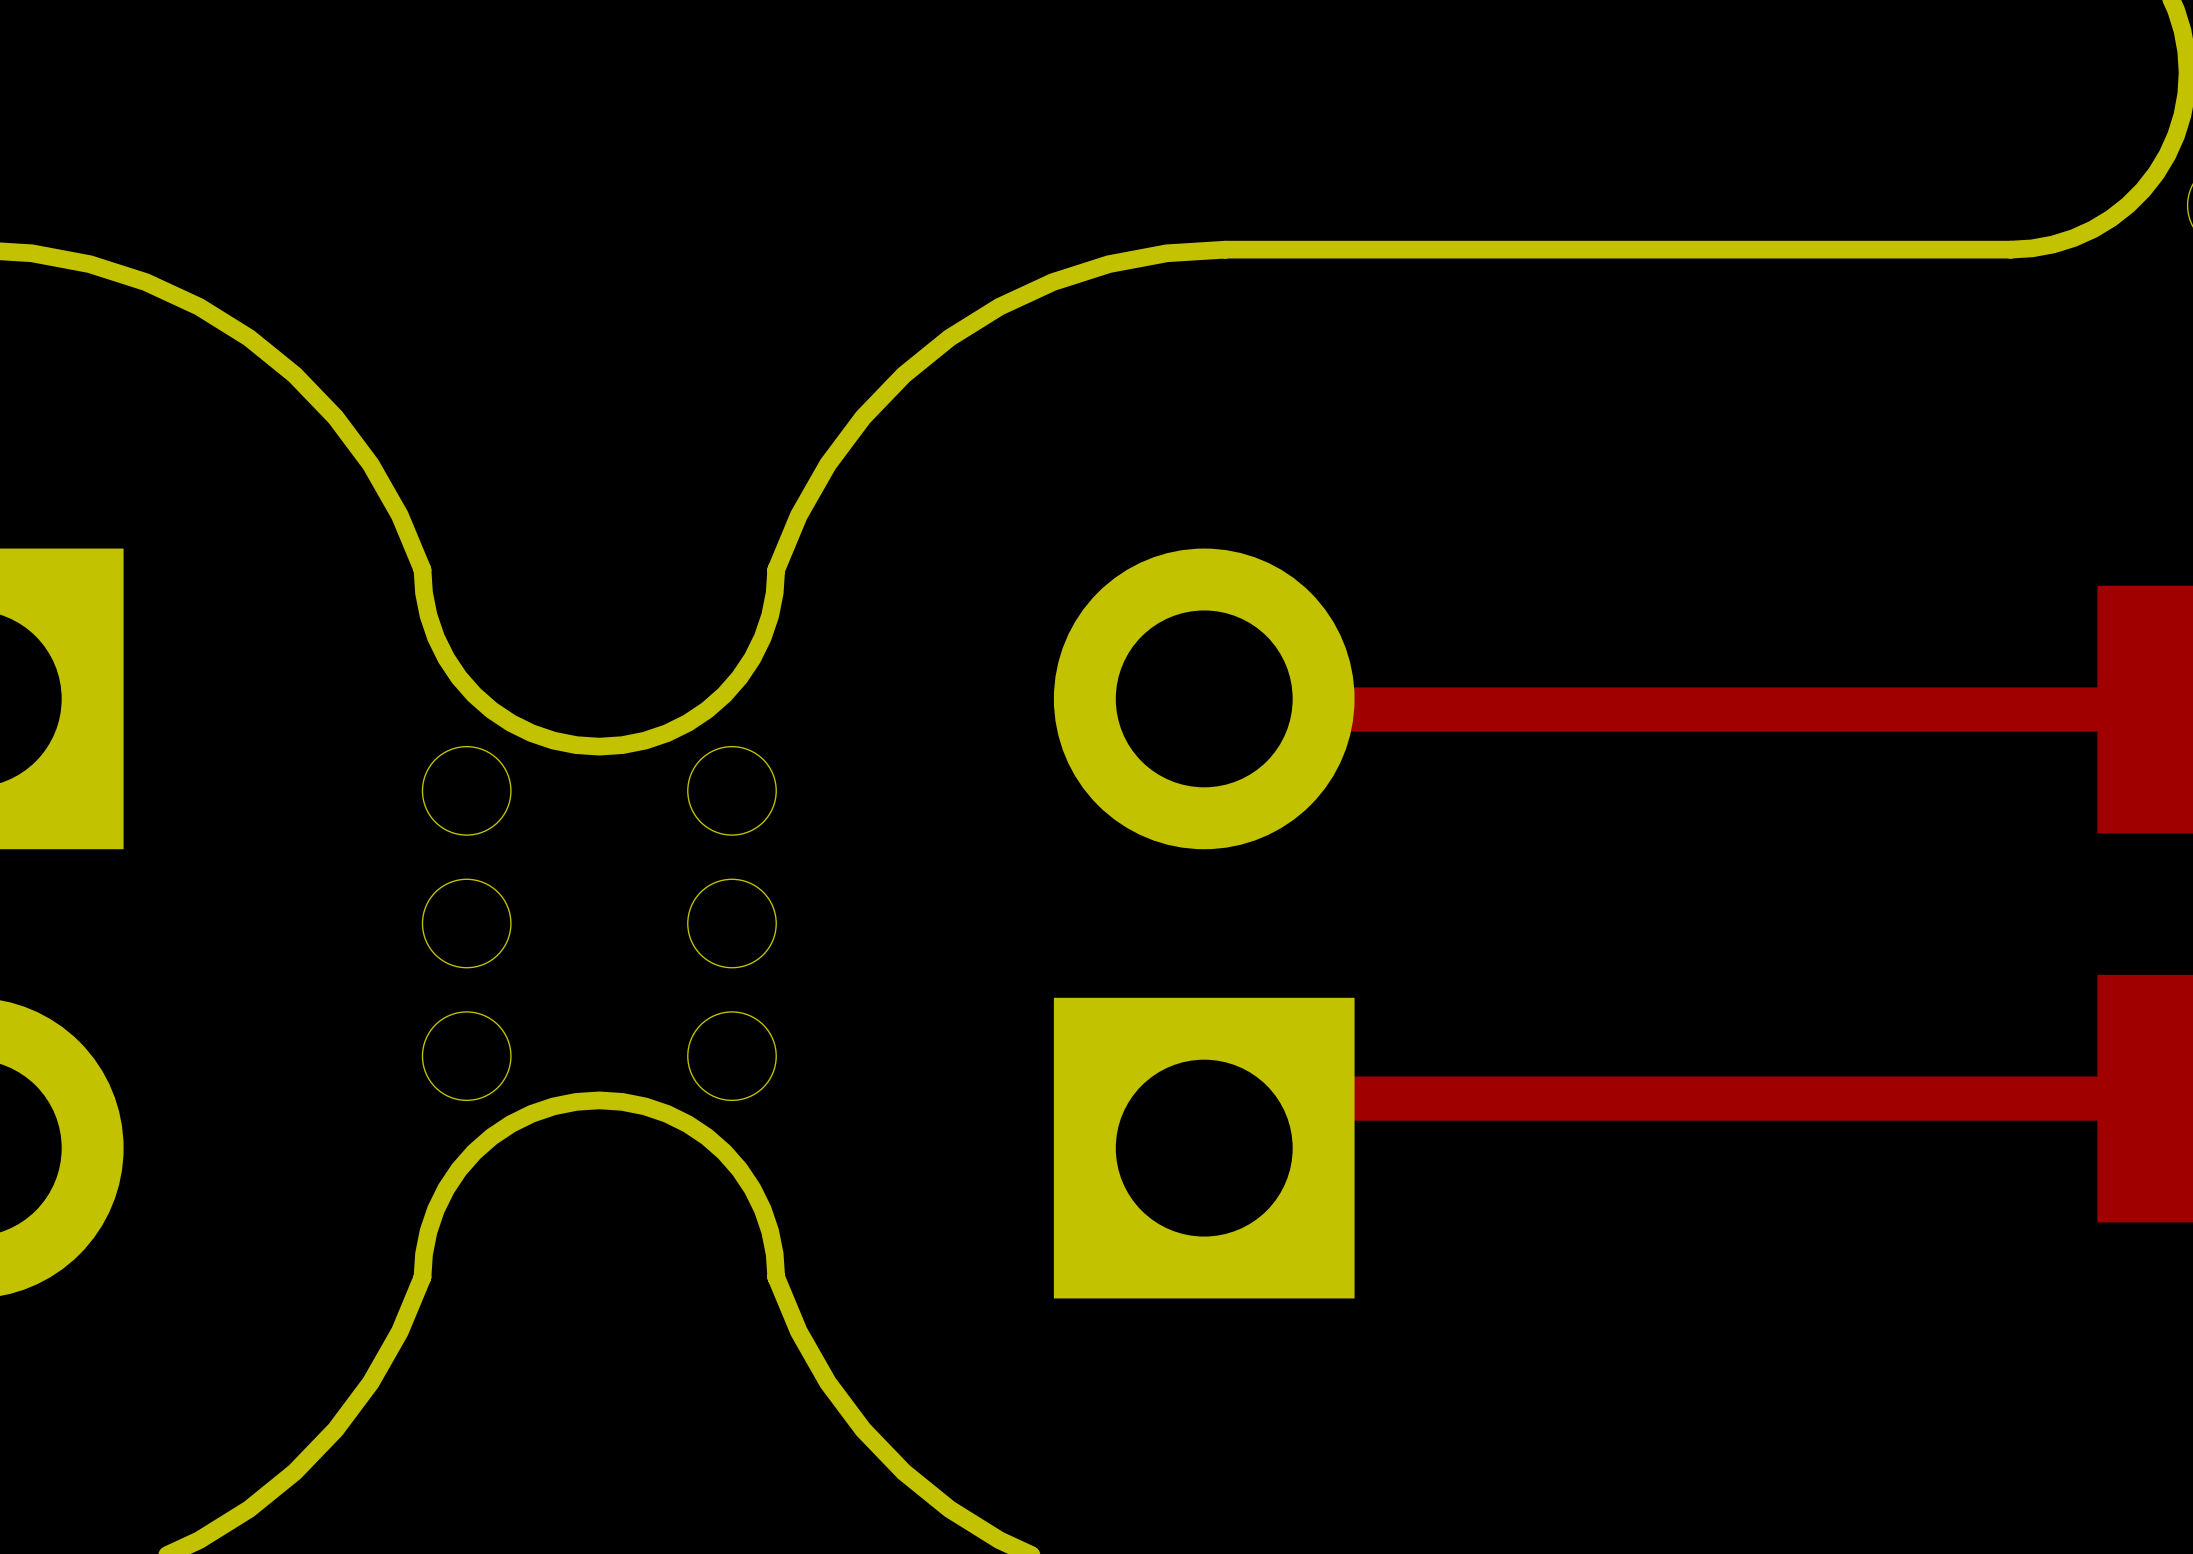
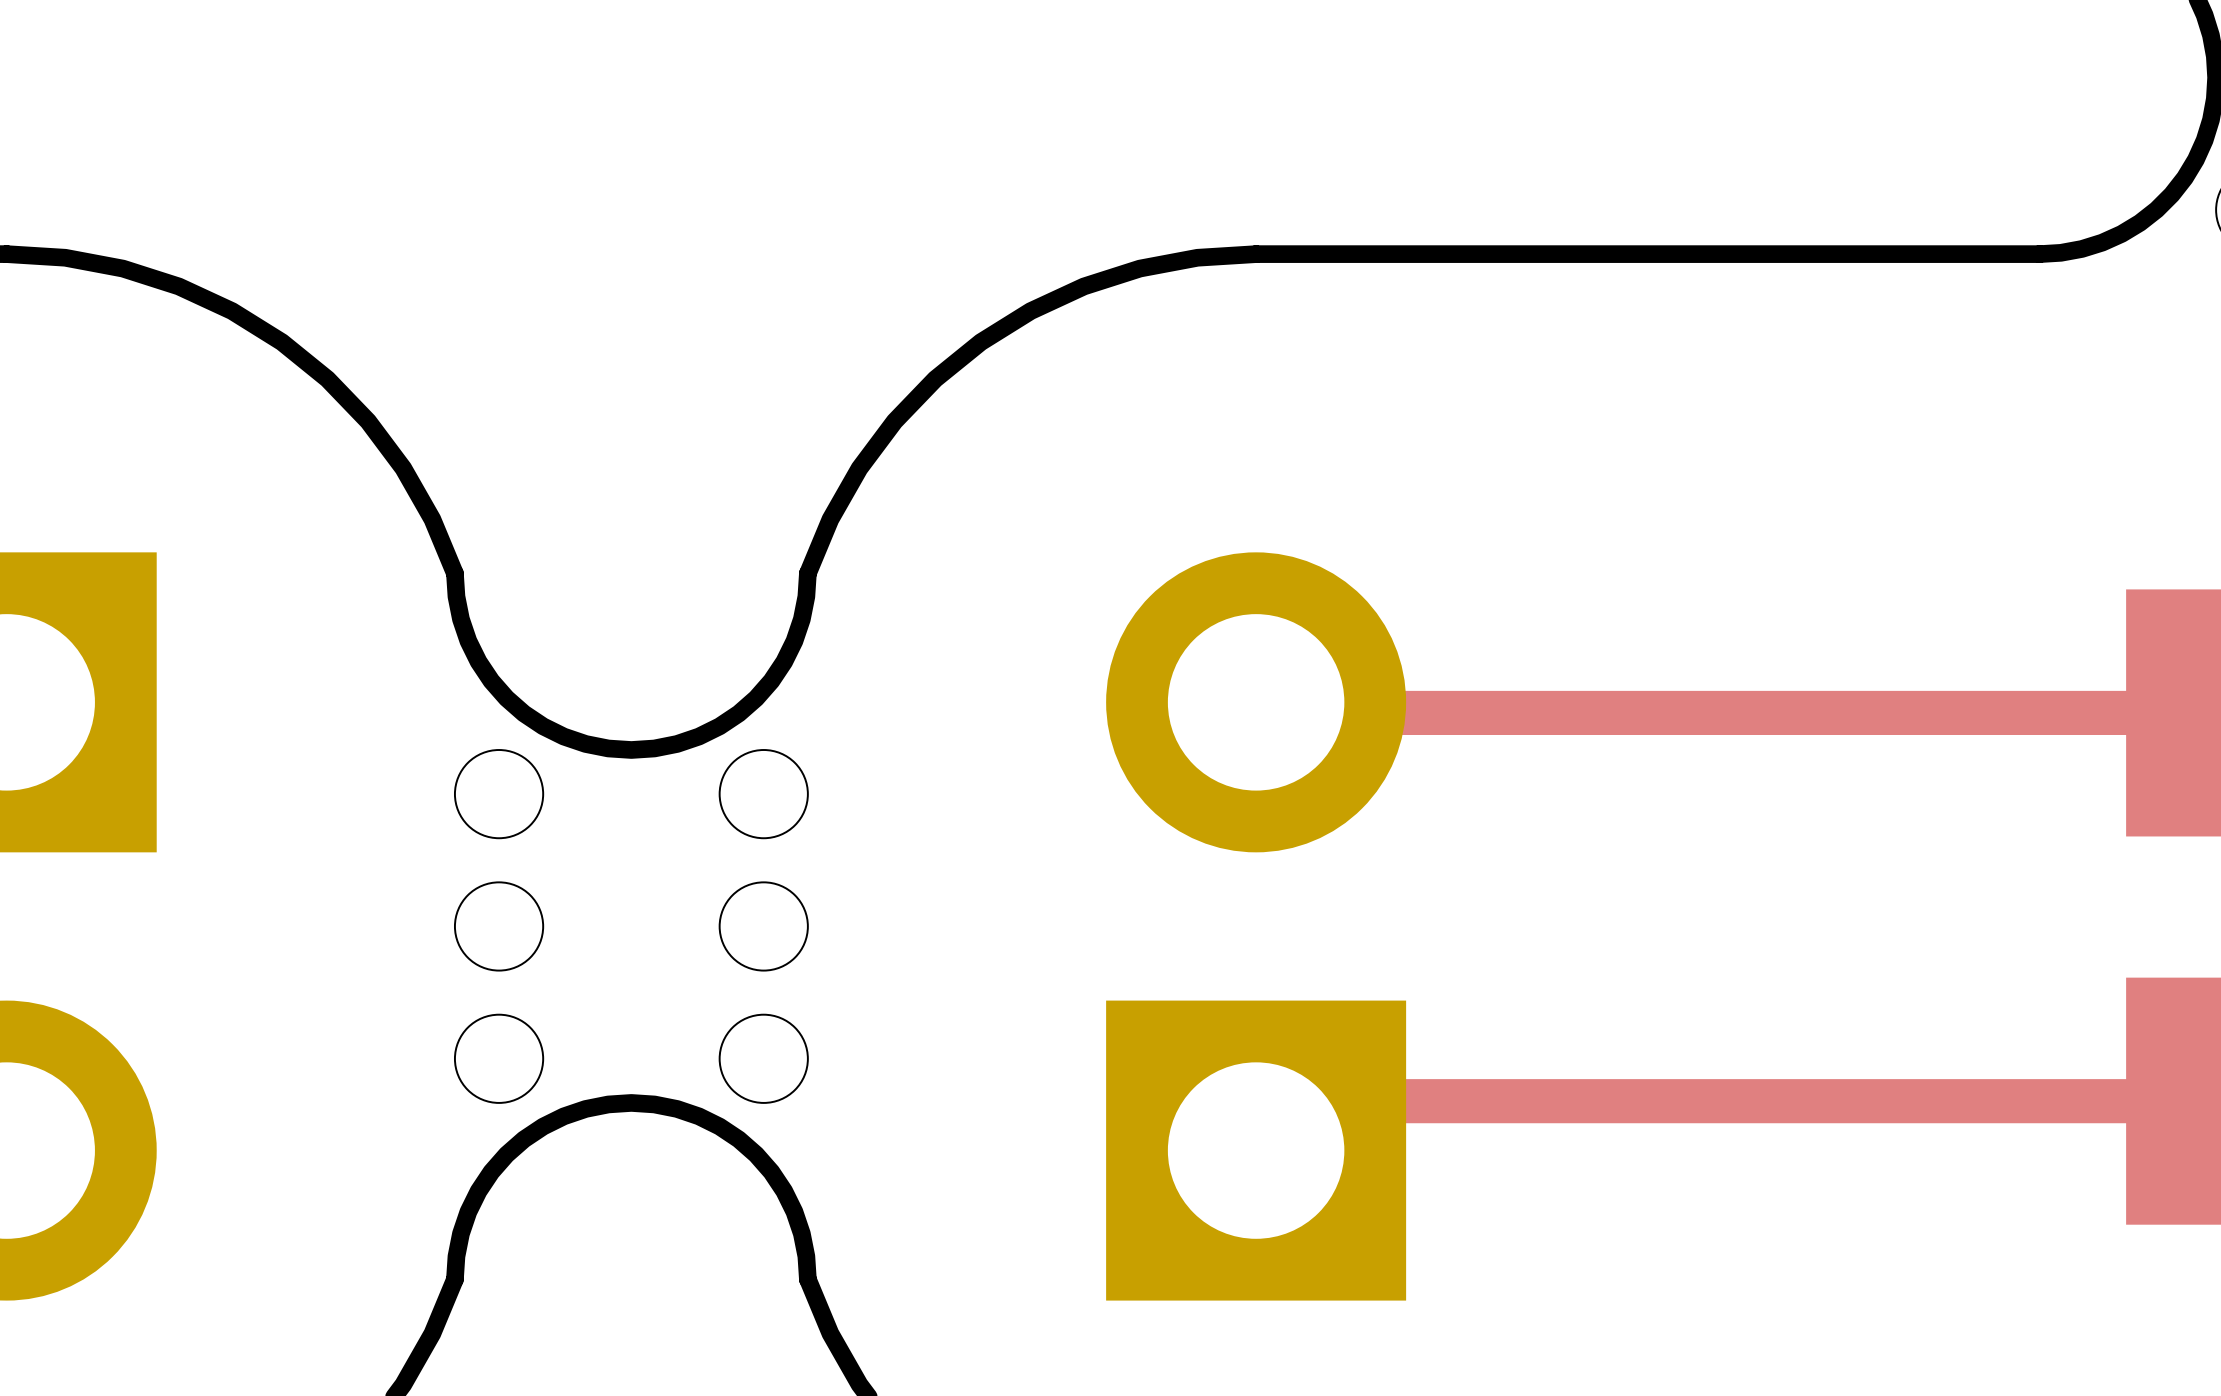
part position: (1204, 923) -> (1256, 926)

